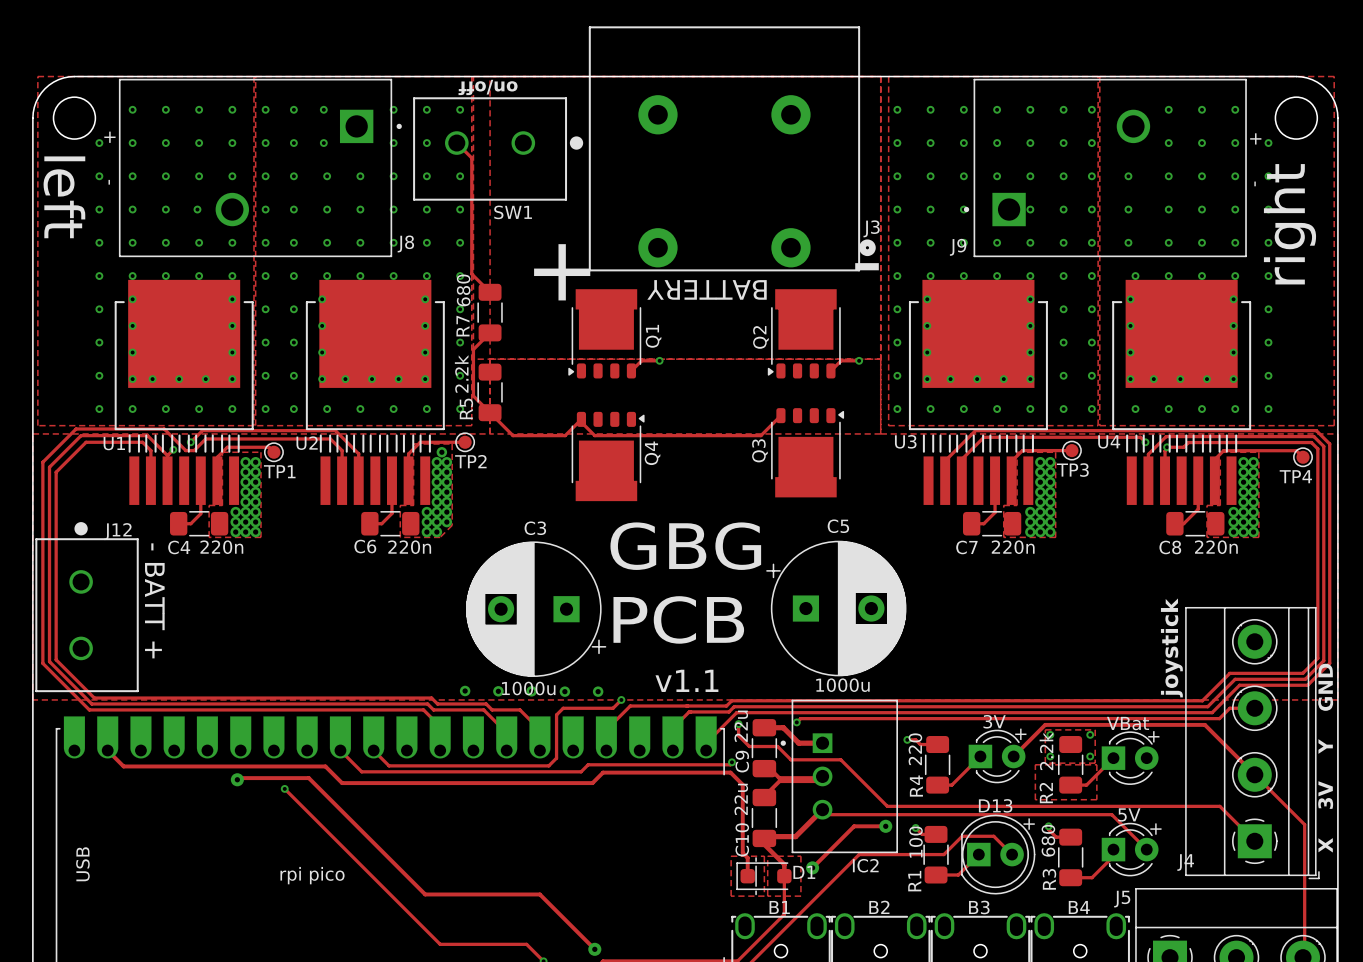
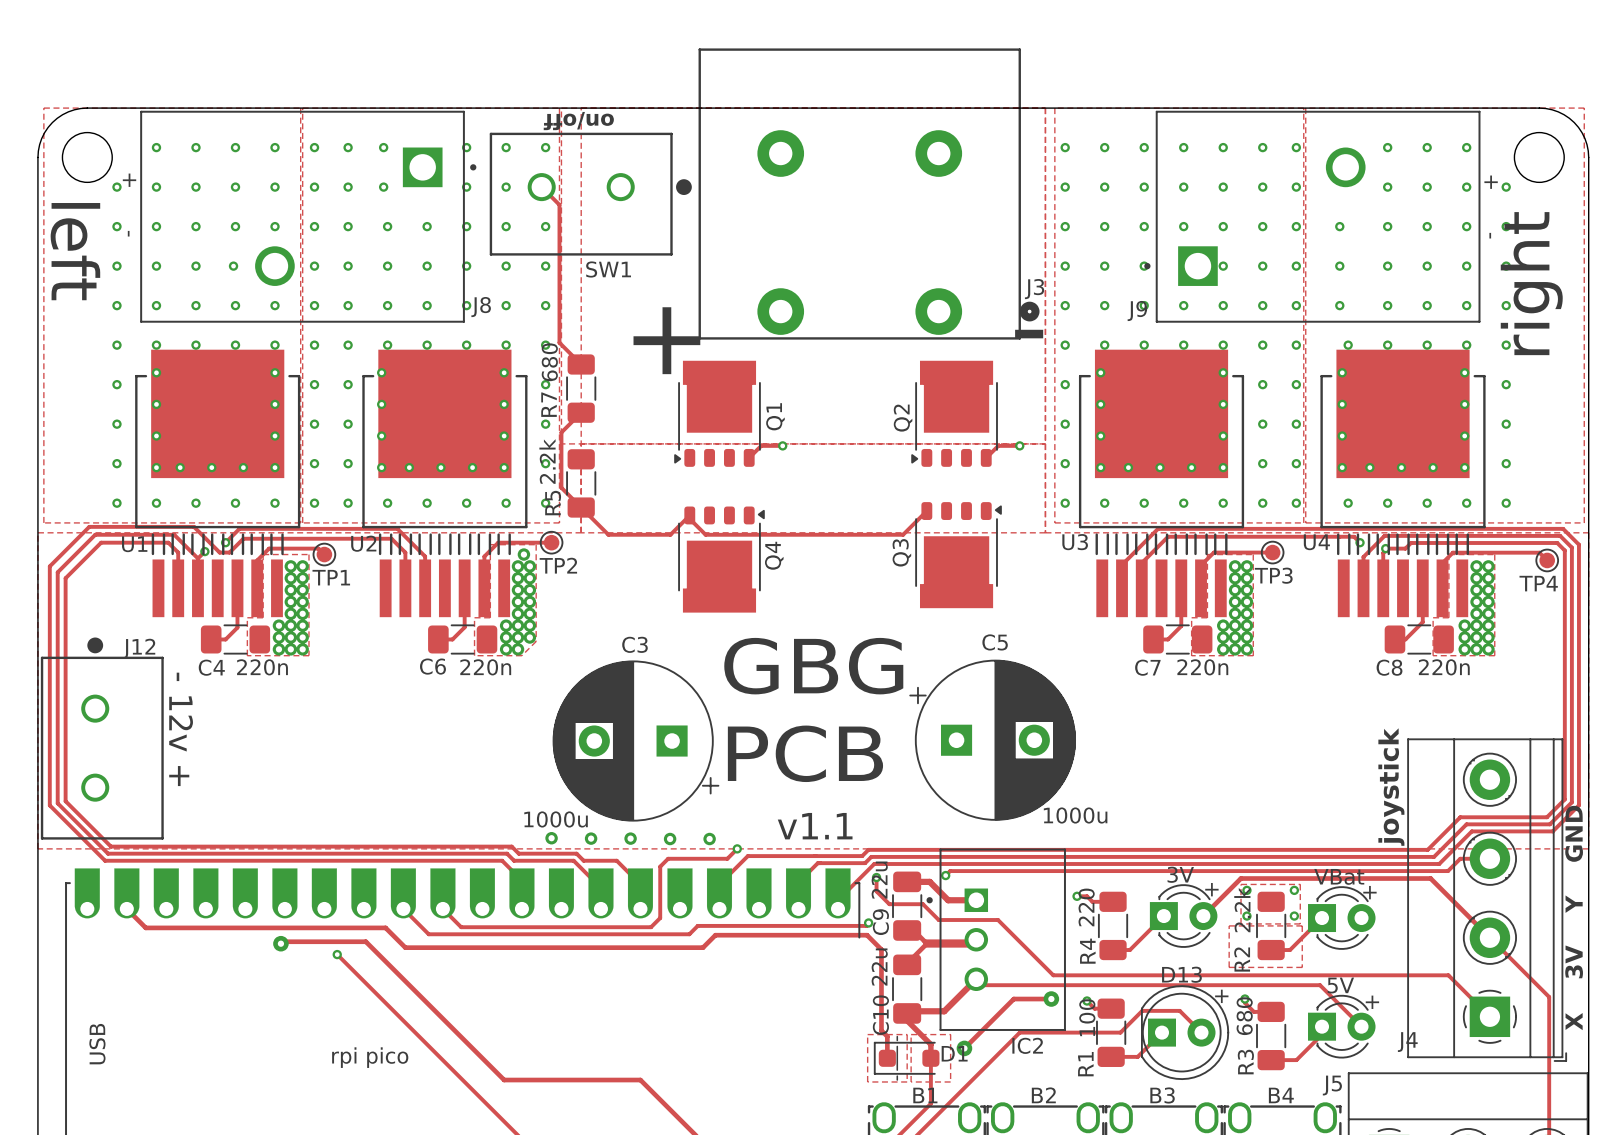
text: BATTERY (707, 289) -> none
text: - BATT + (154, 600) -> - 12v + (181, 729)
text position: 1000u (842, 685) -> 1000u (1075, 815)
text position: 1000u (528, 688) -> 1000u (556, 819)

